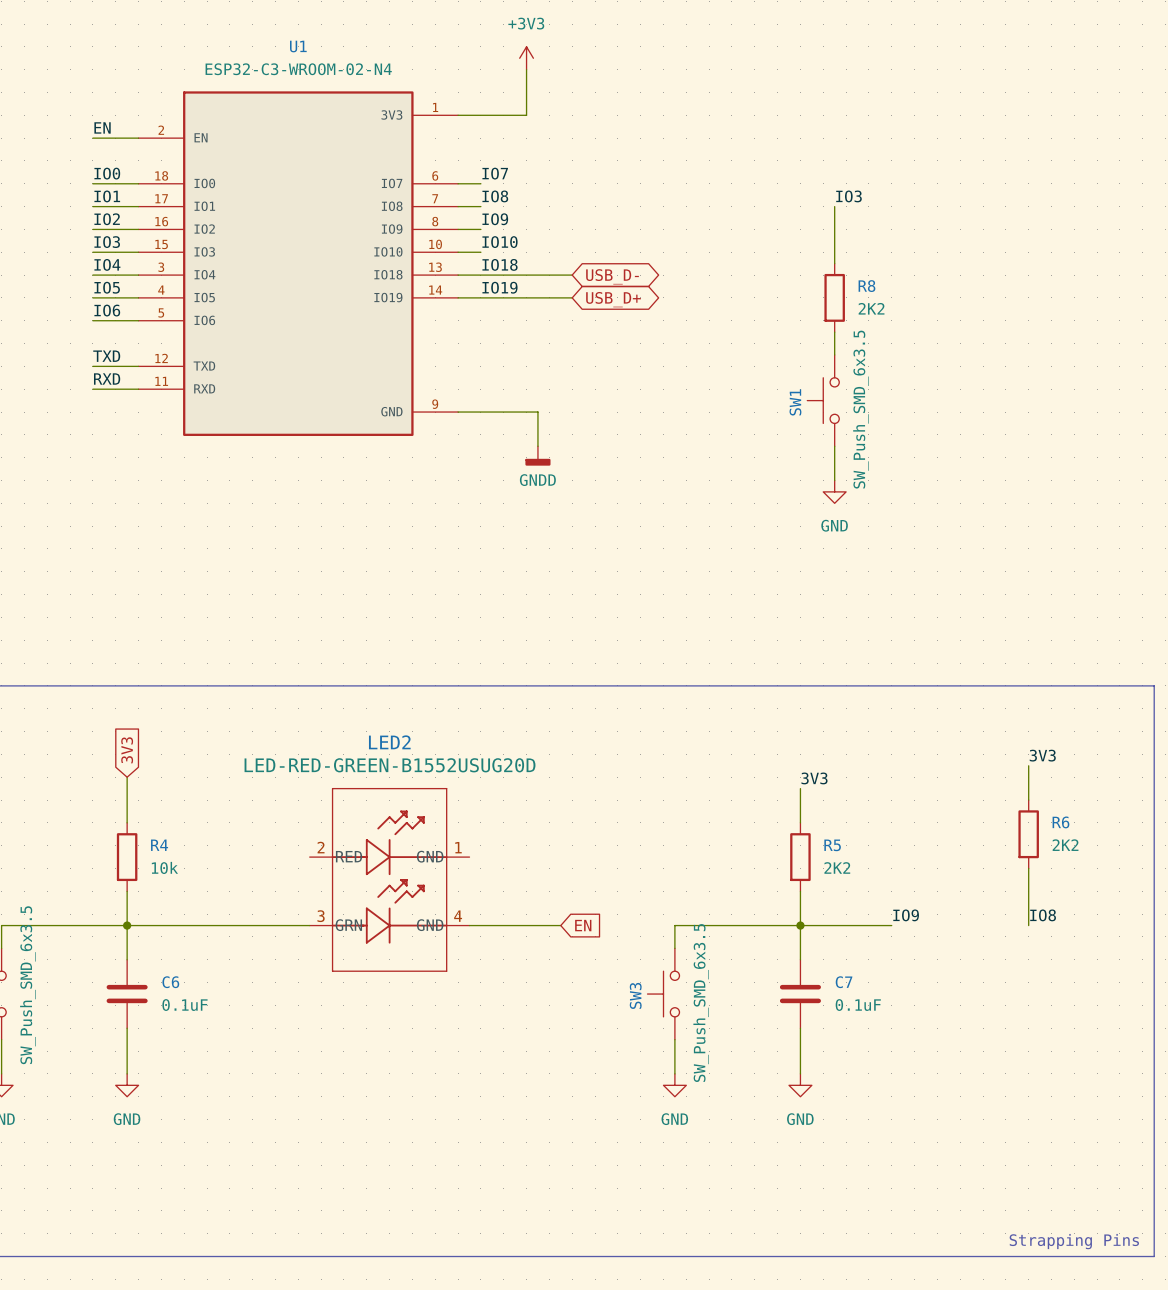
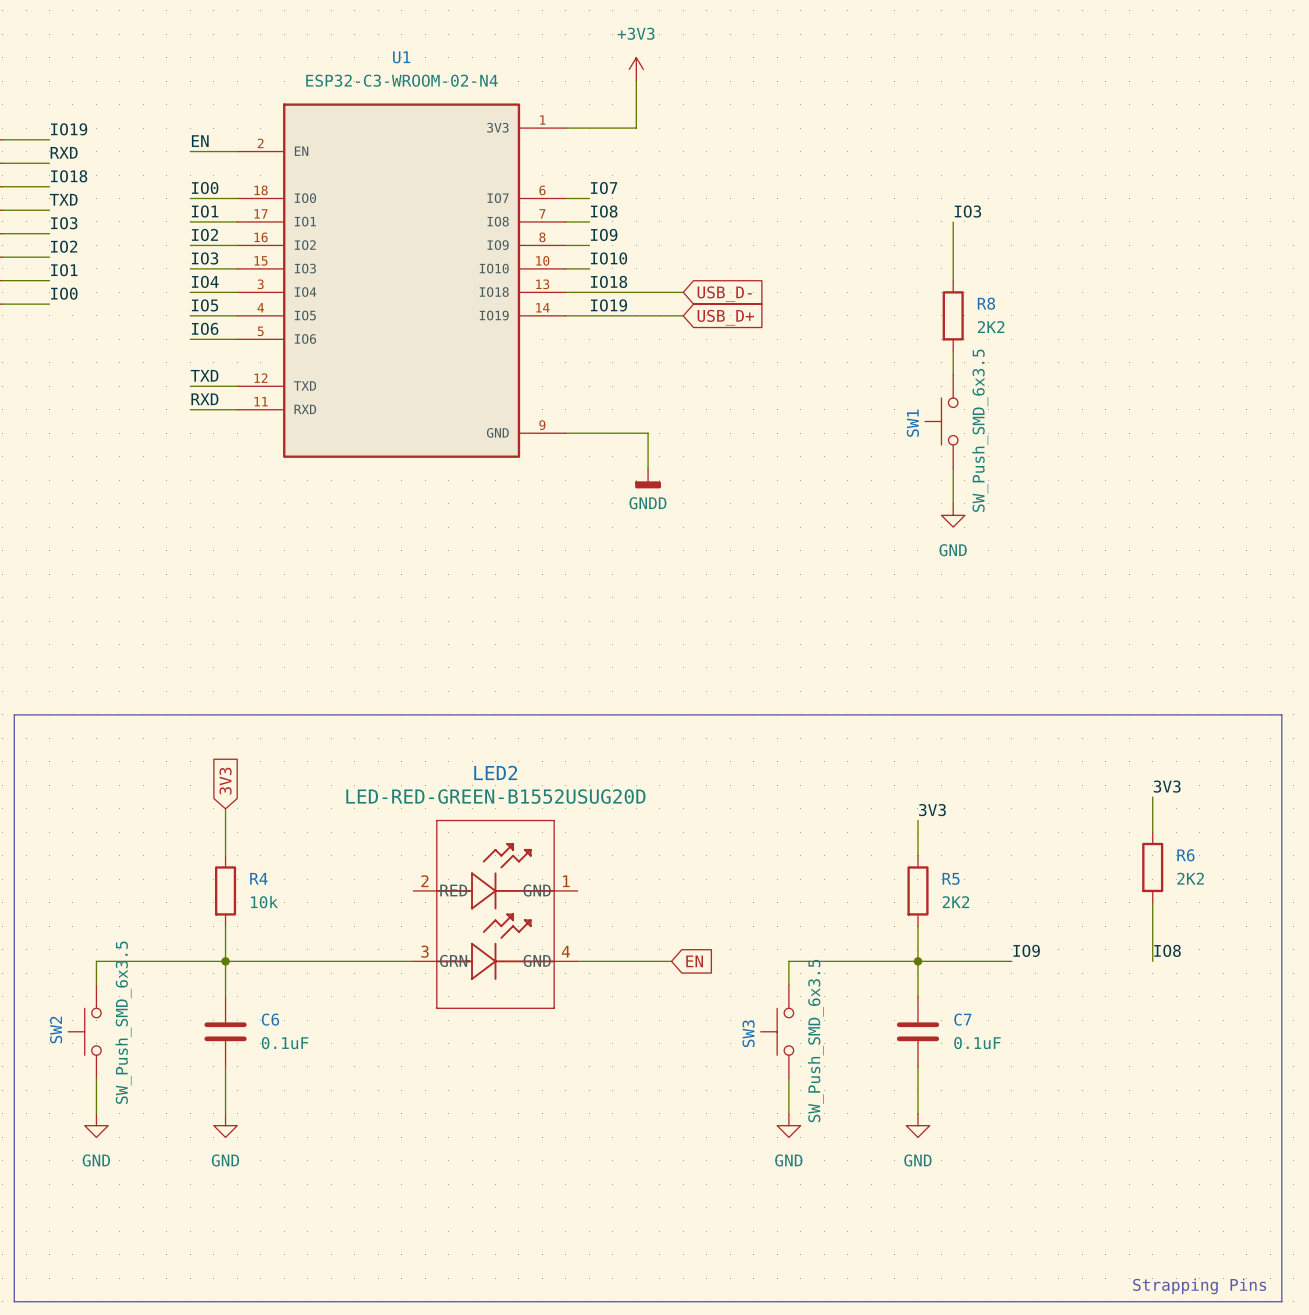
global label shape: bidirectional (612, 276) -> input (724, 294)
global label shape: bidirectional (613, 299) -> input (725, 317)

